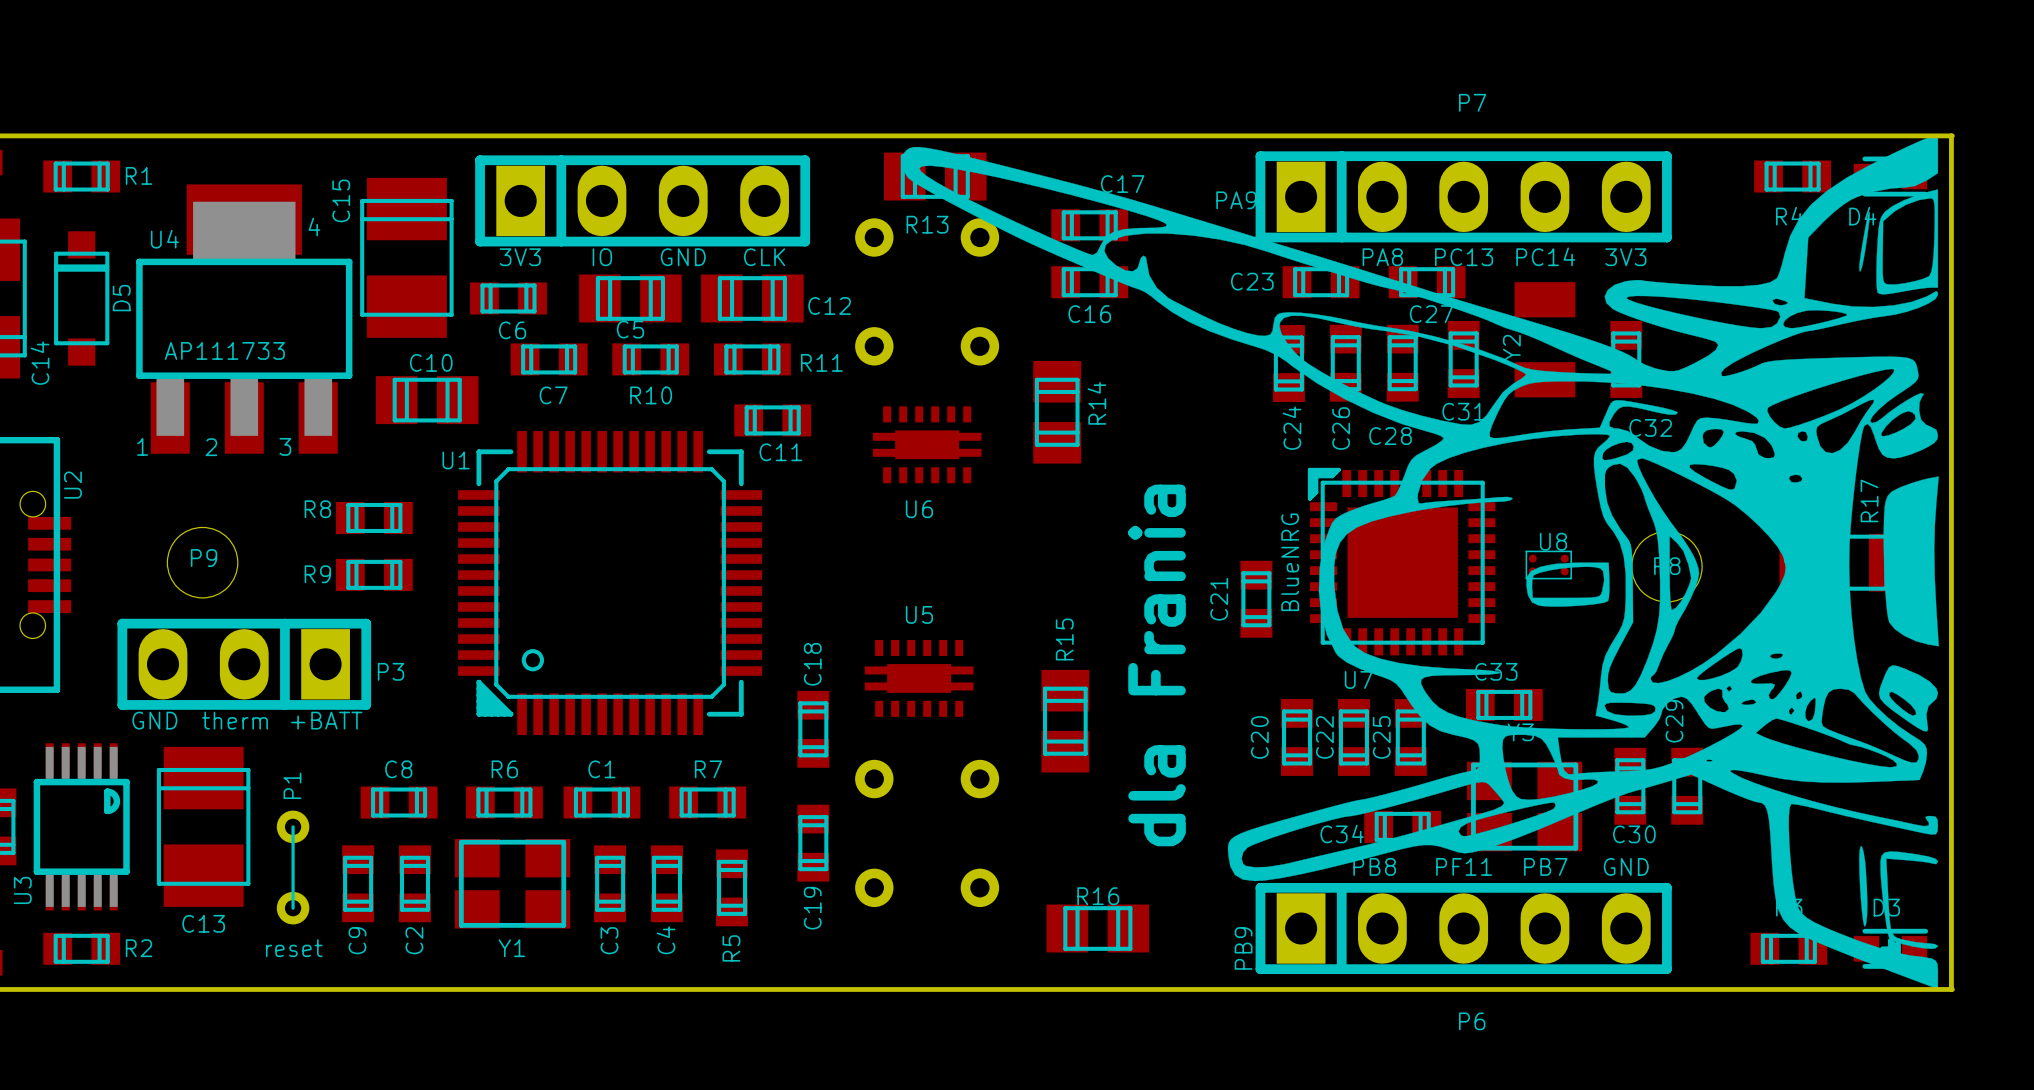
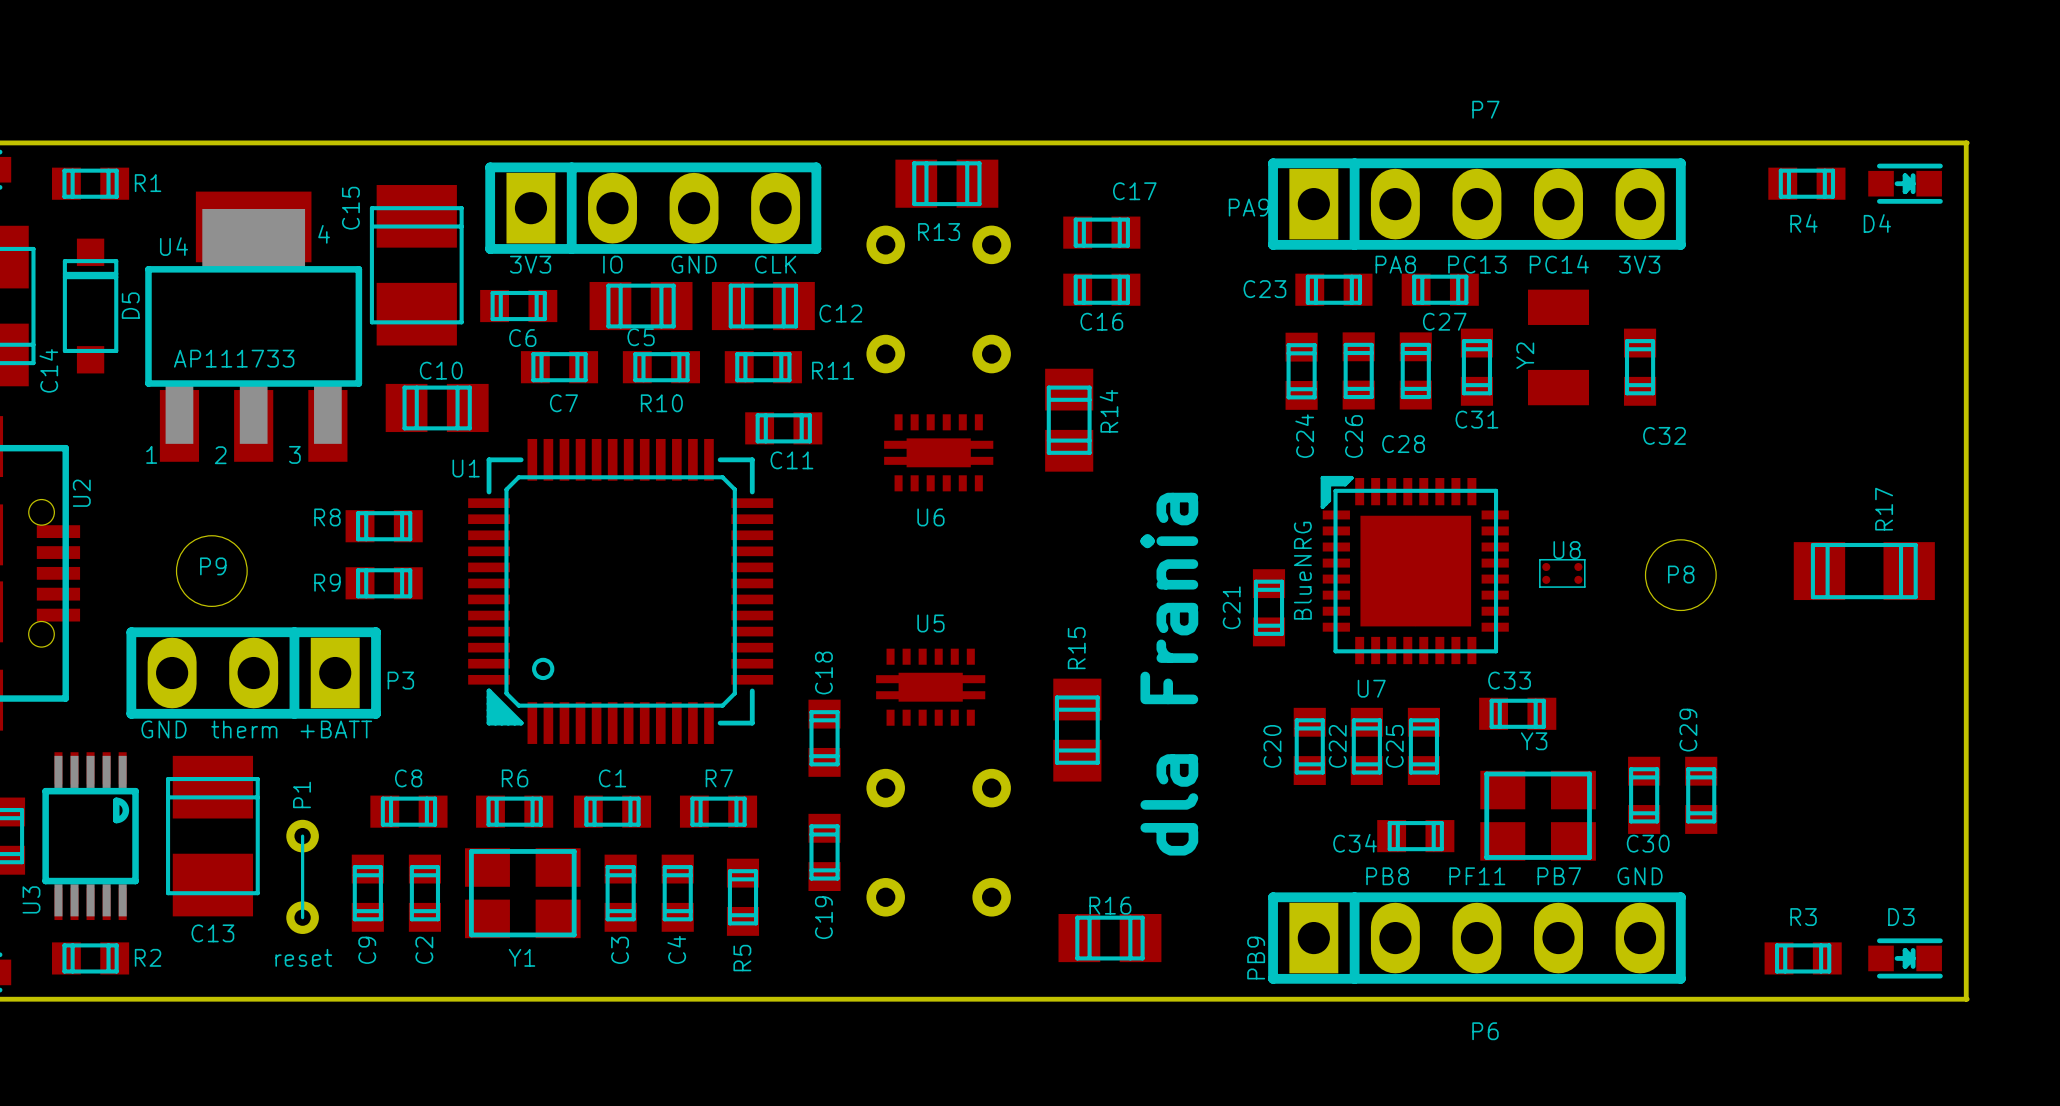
drawing: [901, 133, 1939, 990] -> none

